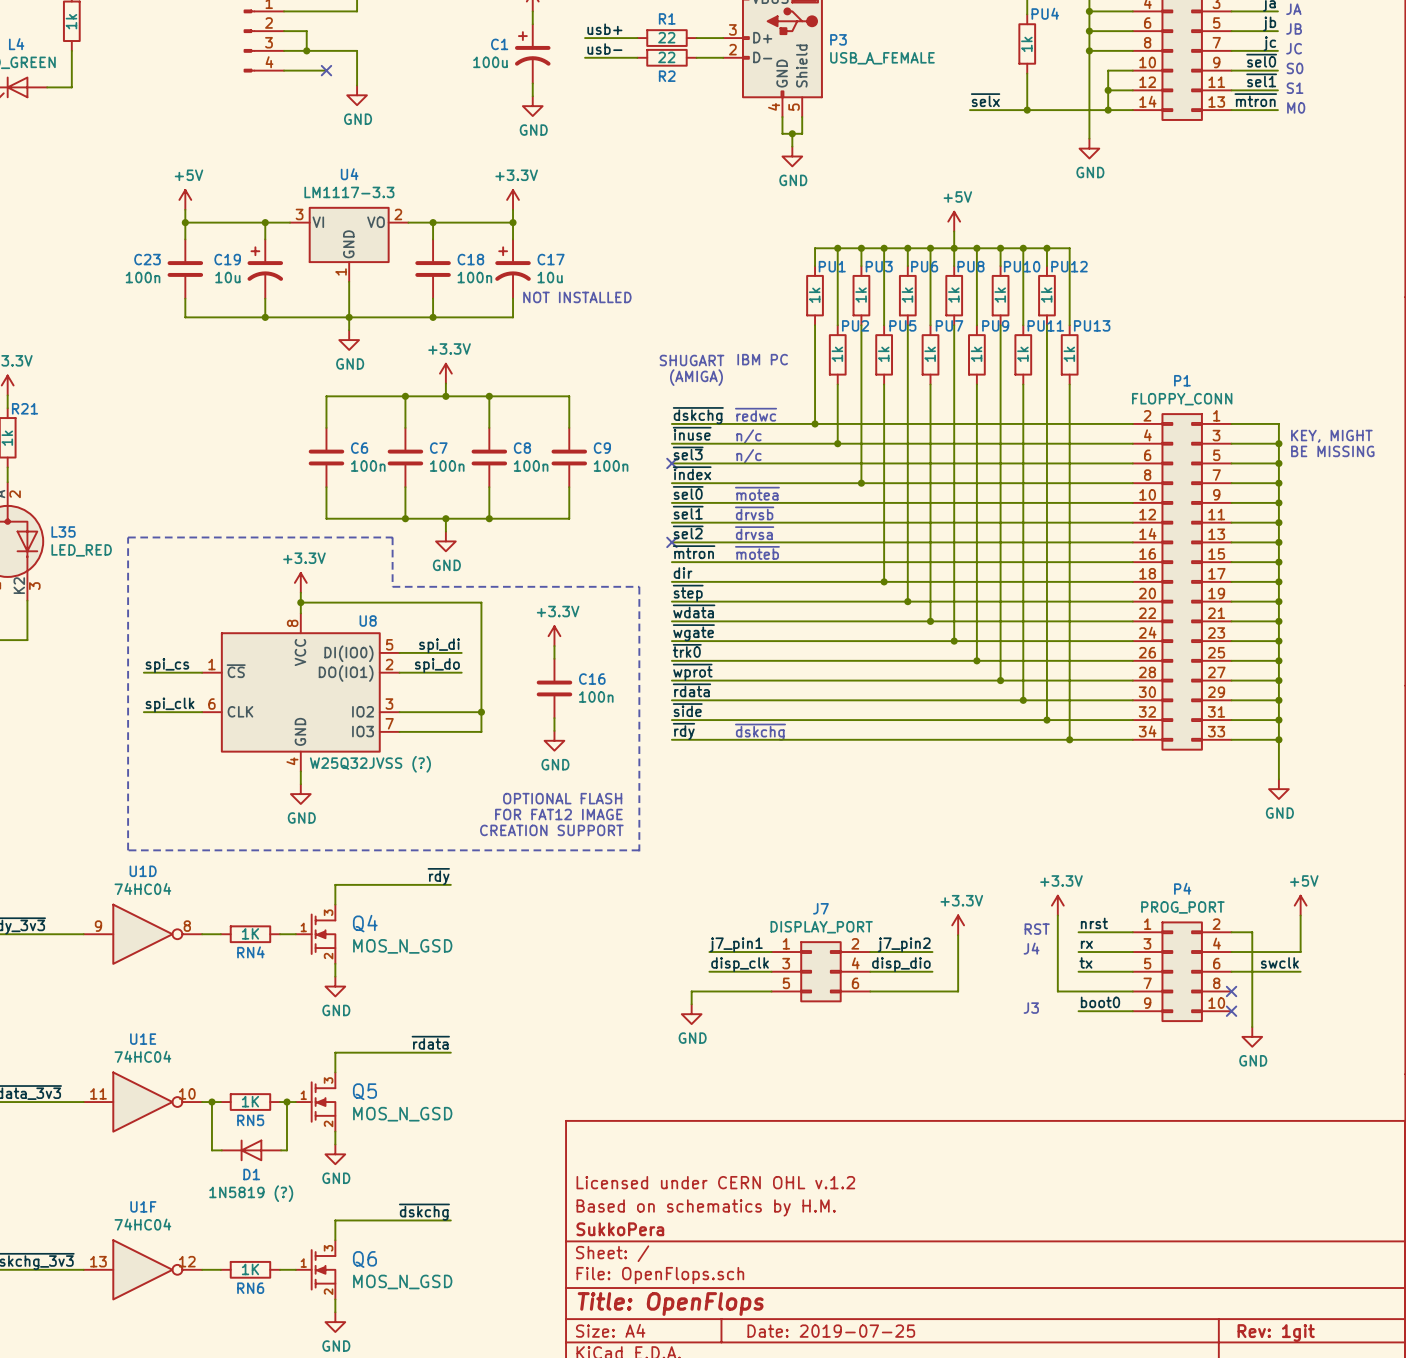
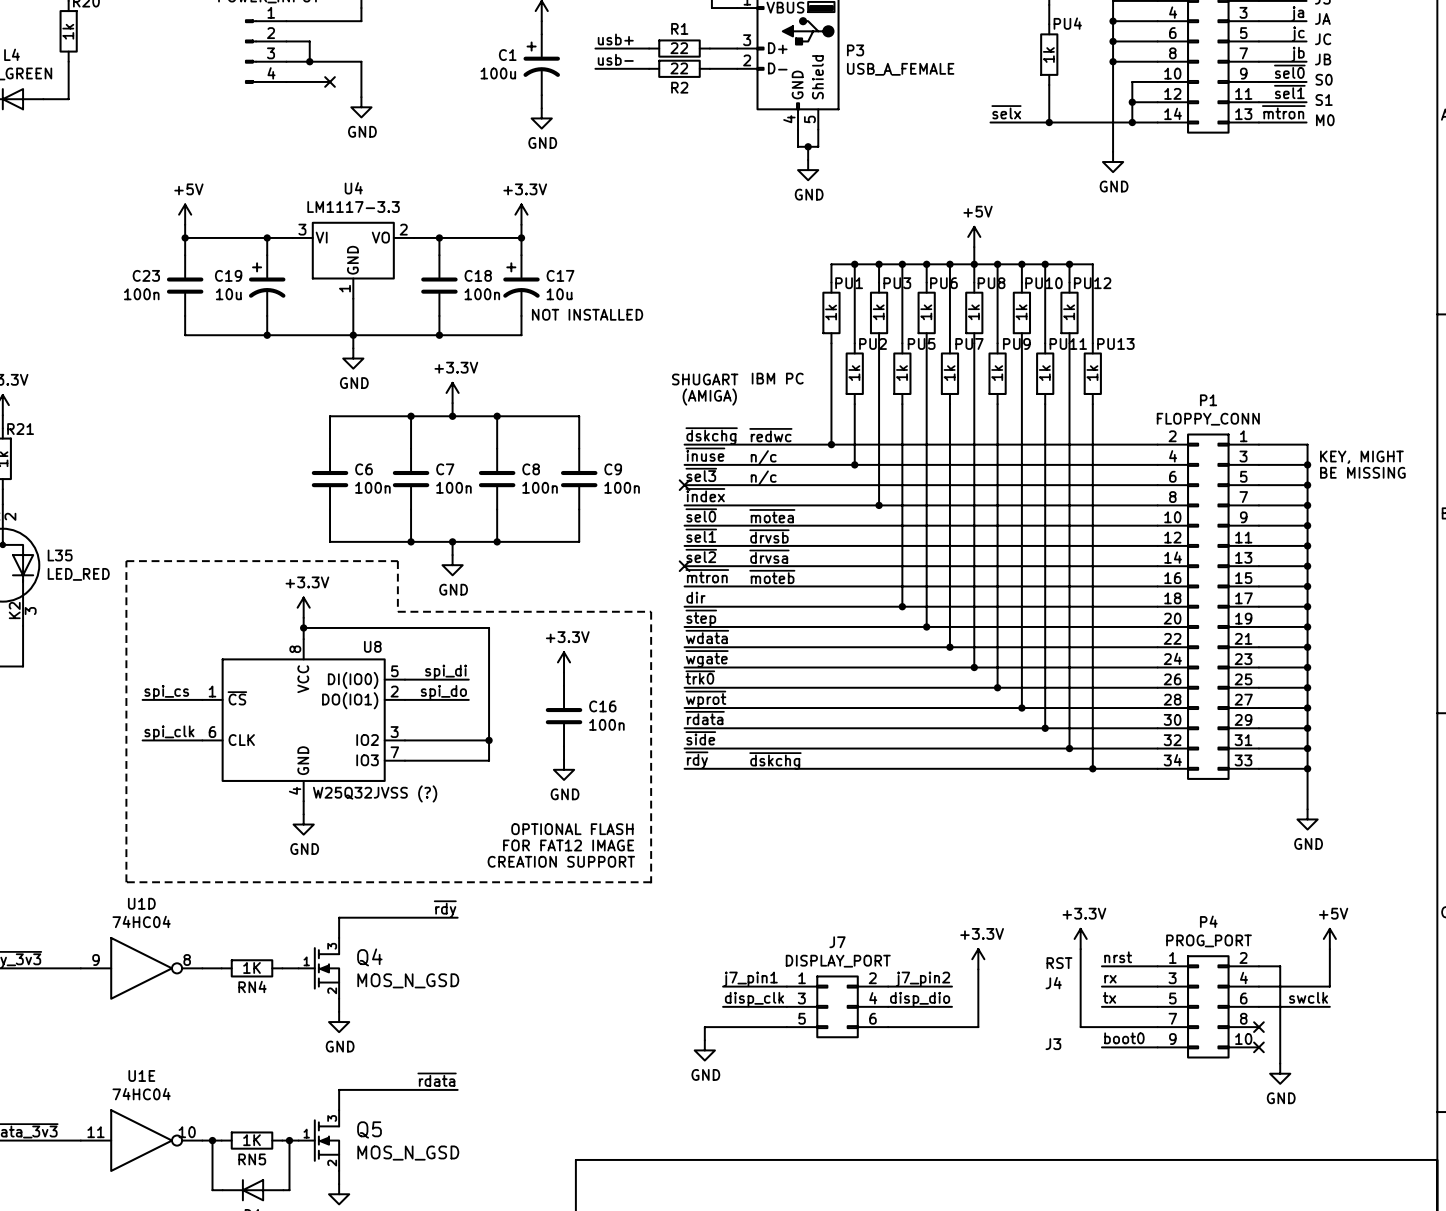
label: jb (1269, 23) -> jc (1298, 34)
text: JB (1294, 28) -> JC (1323, 39)
label: jc (1269, 43) -> jb (1298, 54)
text: JC (1294, 48) -> JB (1323, 59)

